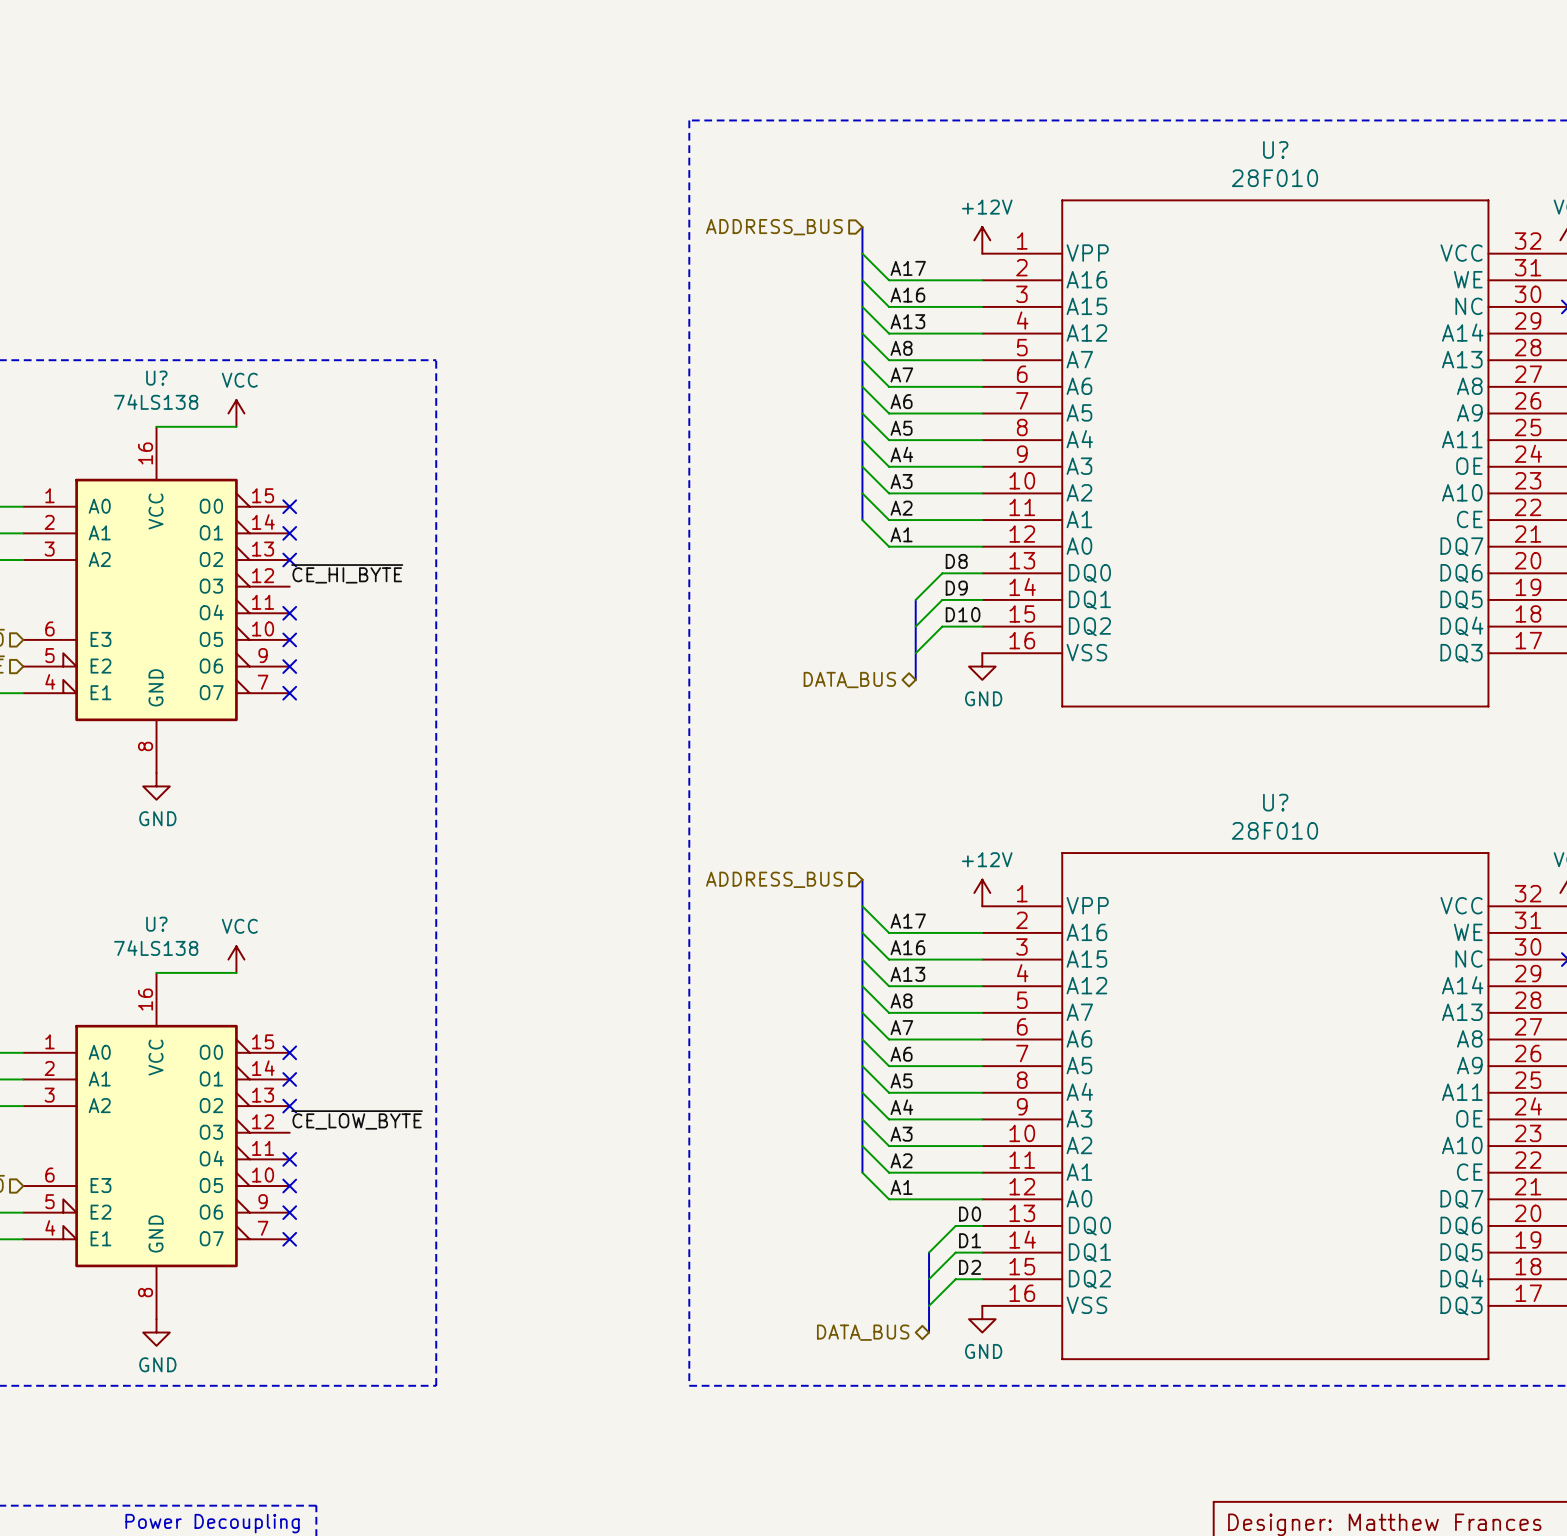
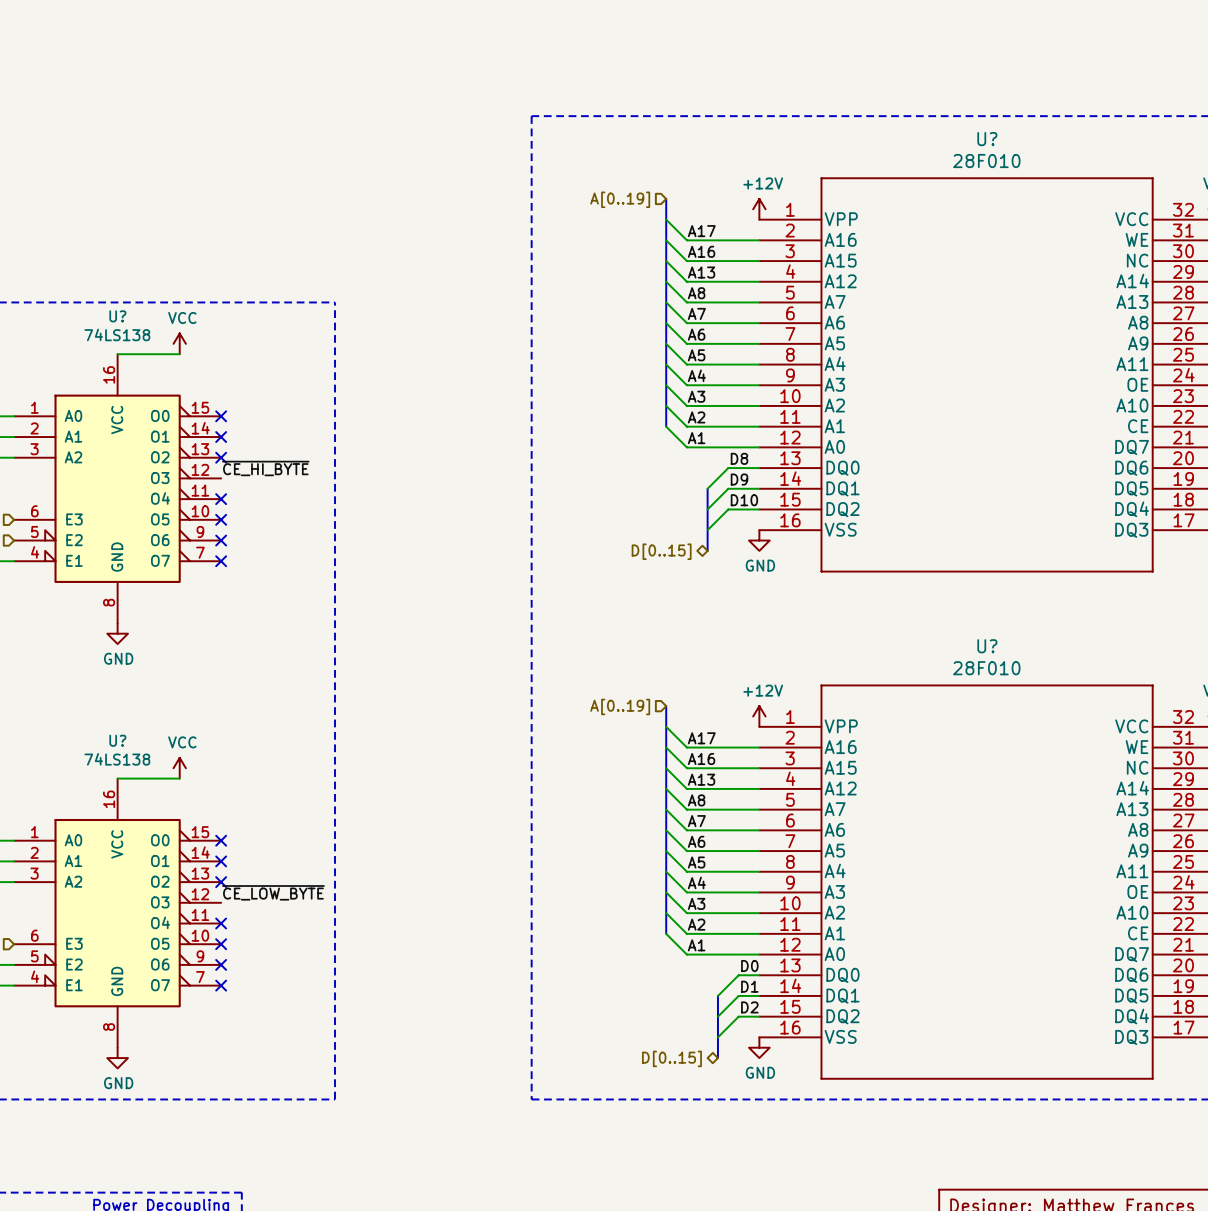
hierarchical label: ADDRESS_BUS (774, 227) -> A[0..19] (620, 199)
hierarchical label: DATA_BUS (849, 680) -> D[0..15] (661, 551)
hierarchical label: ADDRESS_BUS (774, 879) -> A[0..19] (620, 706)
hierarchical label: DATA_BUS (863, 1332) -> D[0..15] (671, 1058)

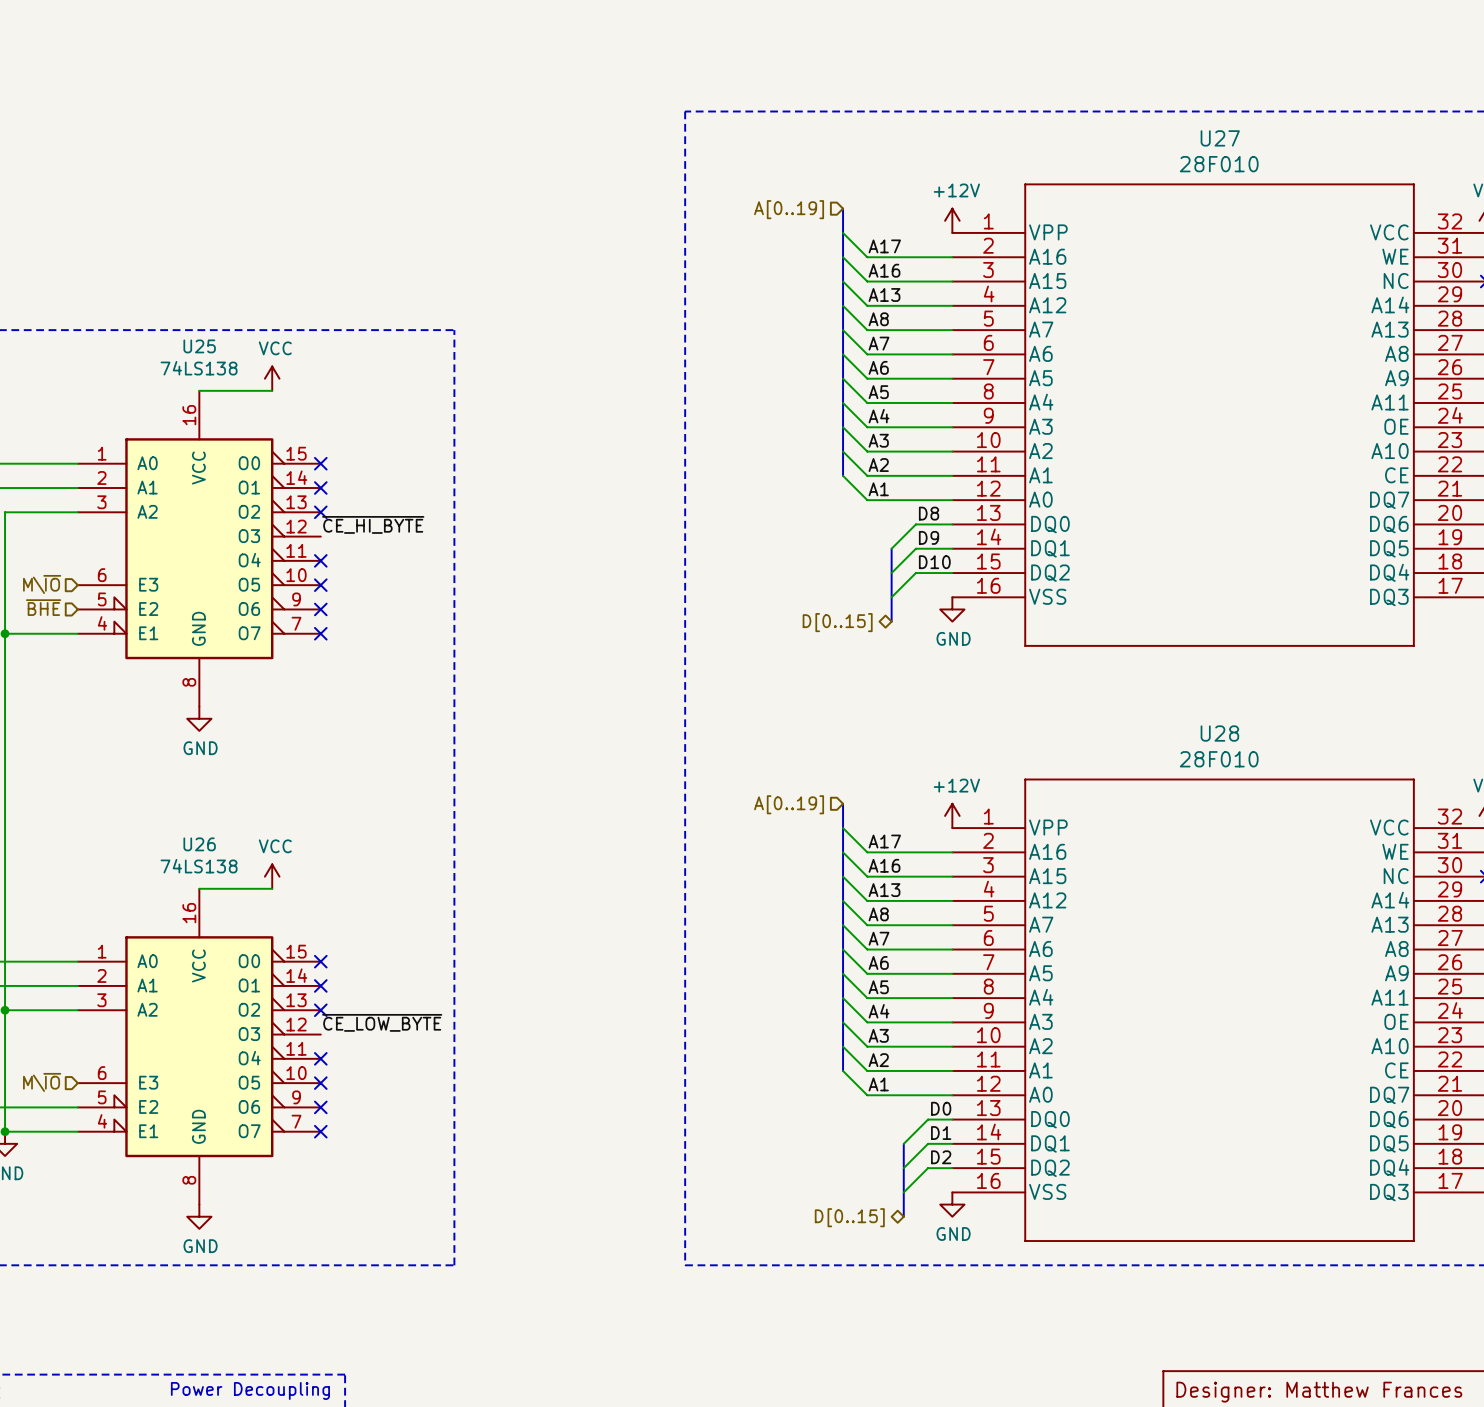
U? name: U? (987, 139) -> U27 (1220, 138)
U? name: U? (117, 316) -> U25 (199, 346)
U? name: U? (987, 646) -> U28 (1219, 733)
U? name: U? (117, 740) -> U26 (199, 844)

